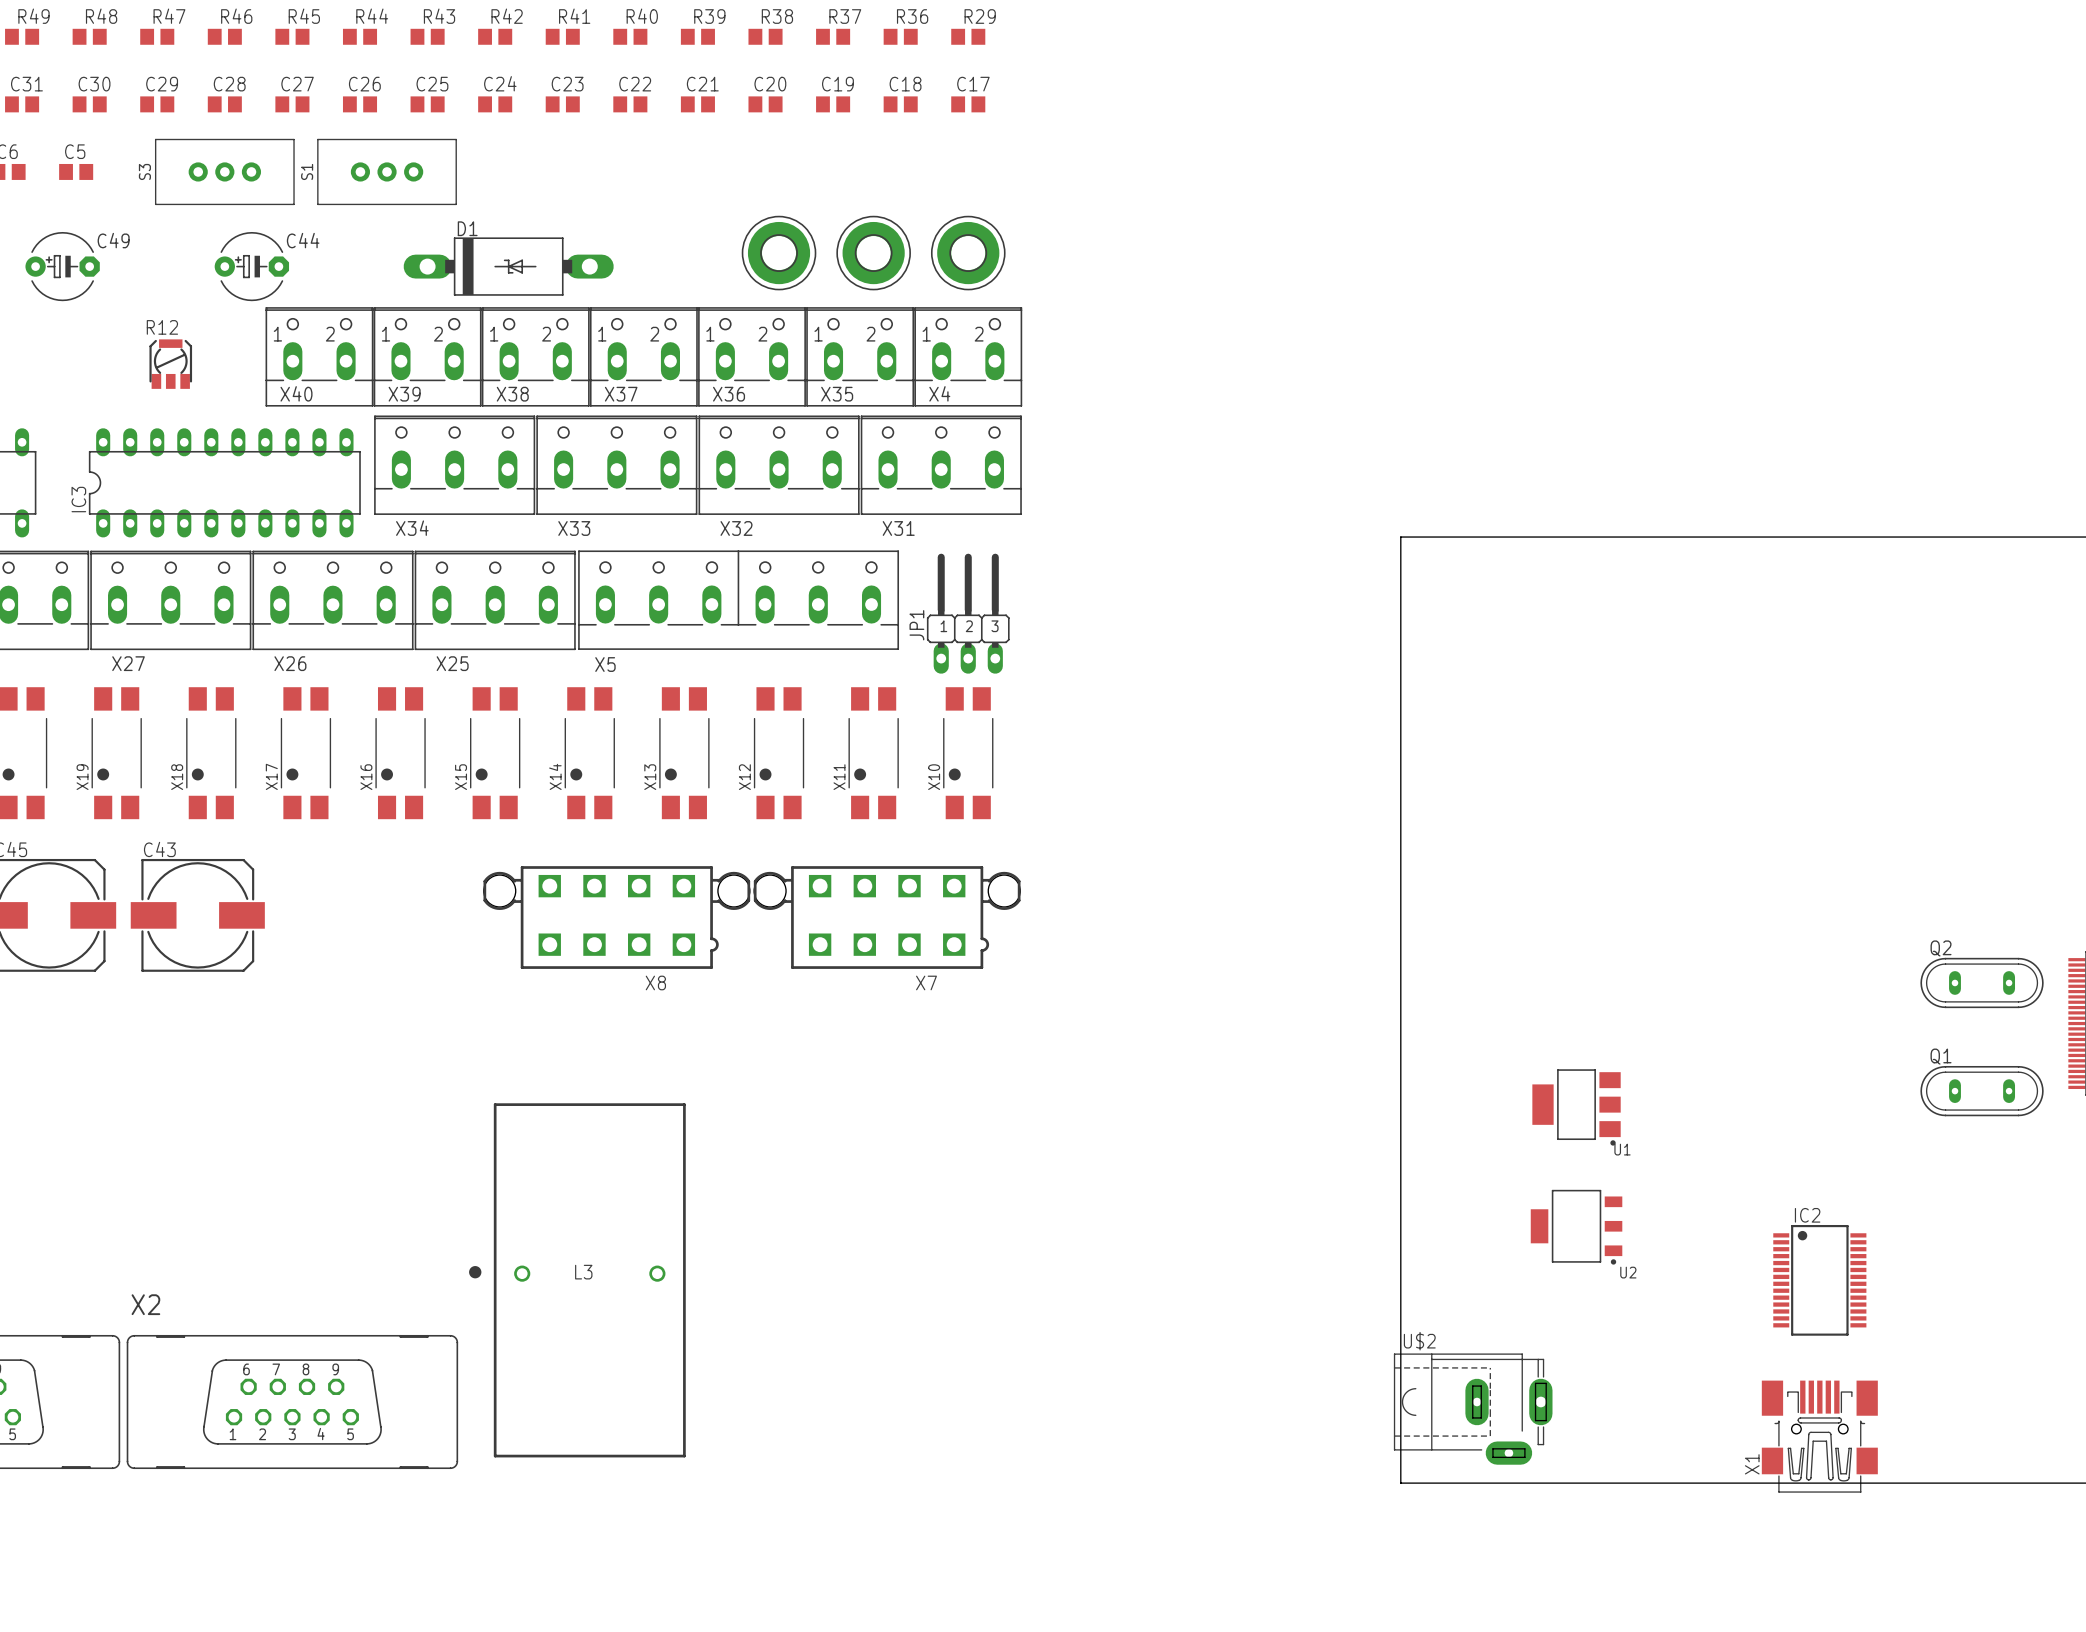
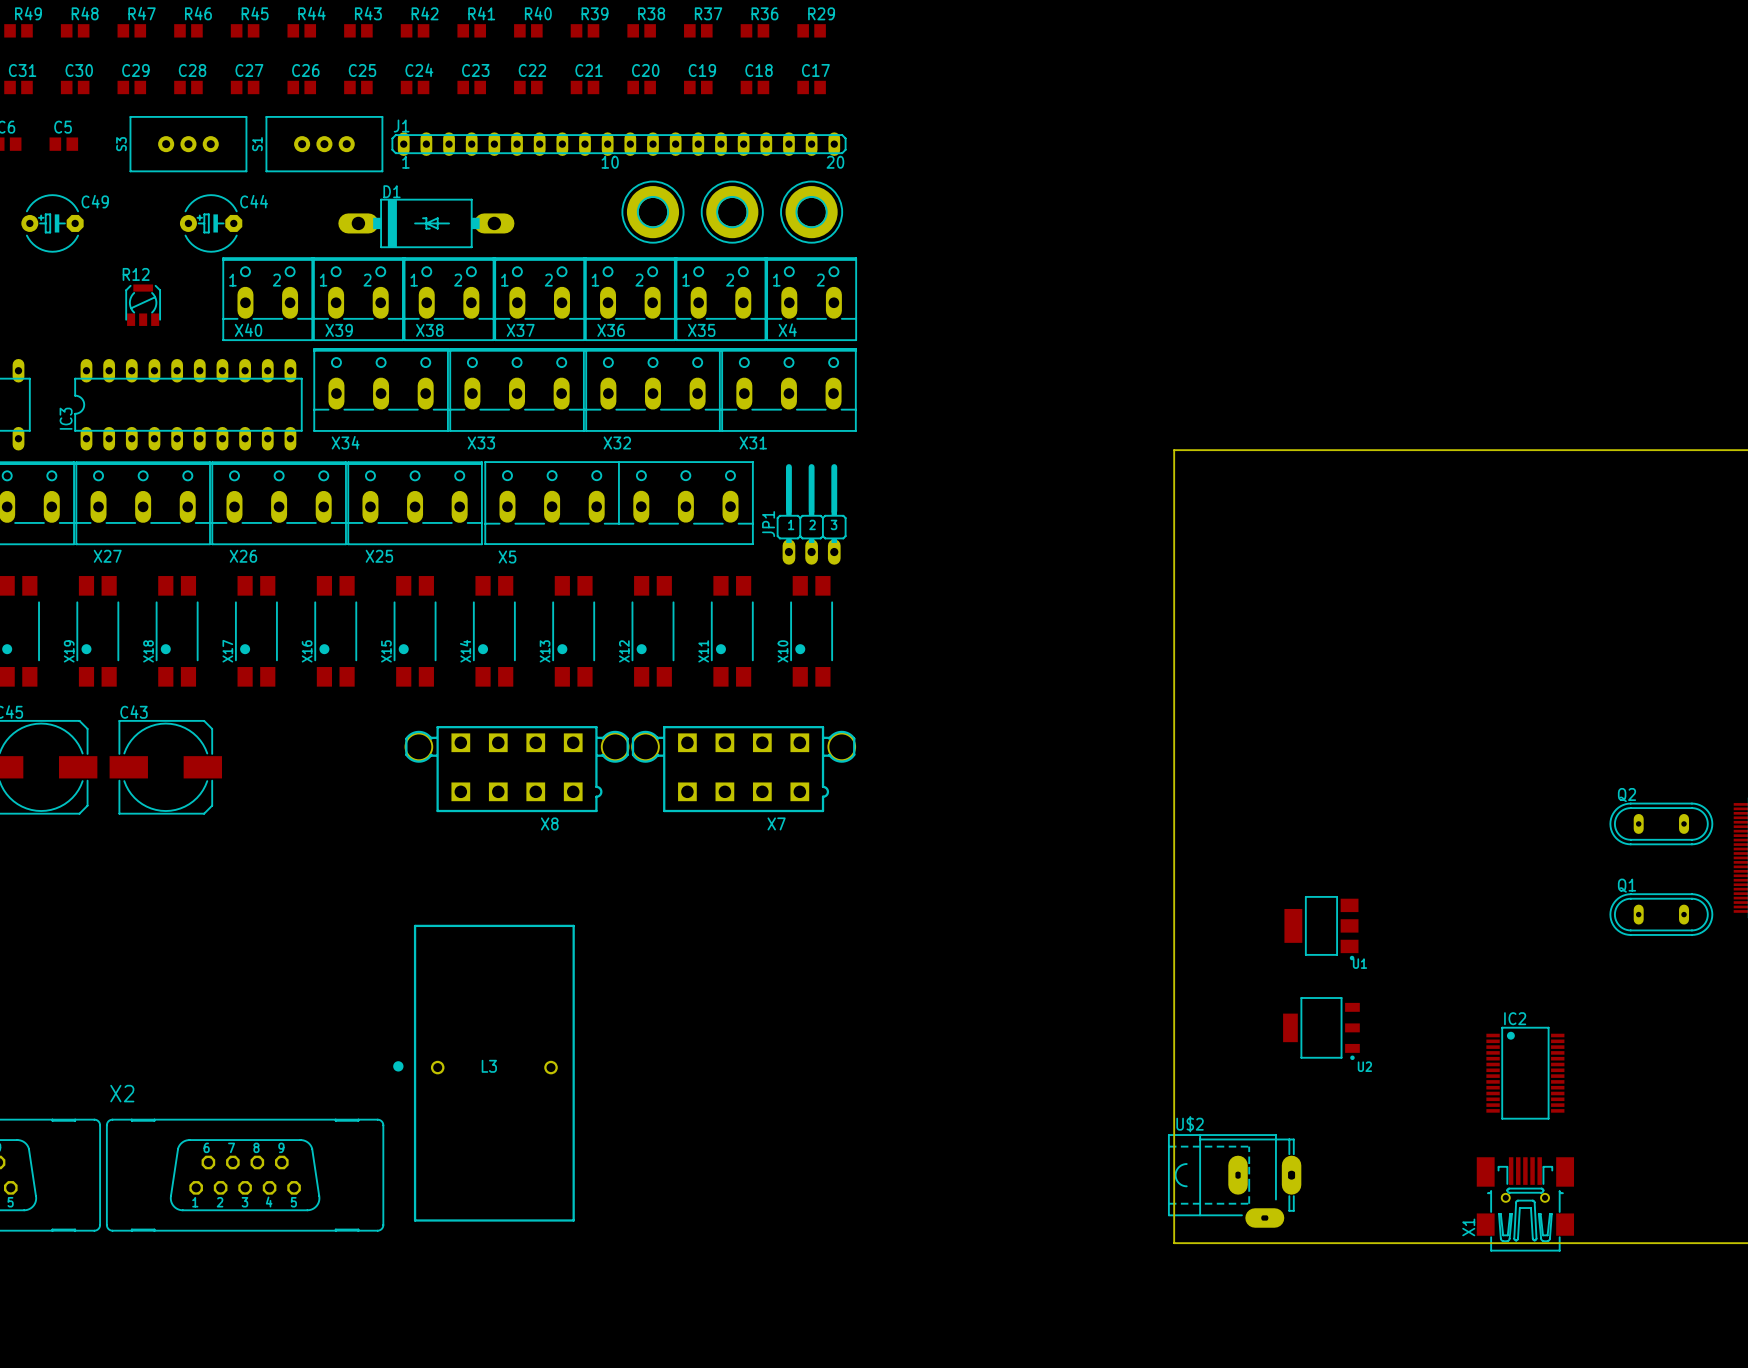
J1: none -> (618, 144)

